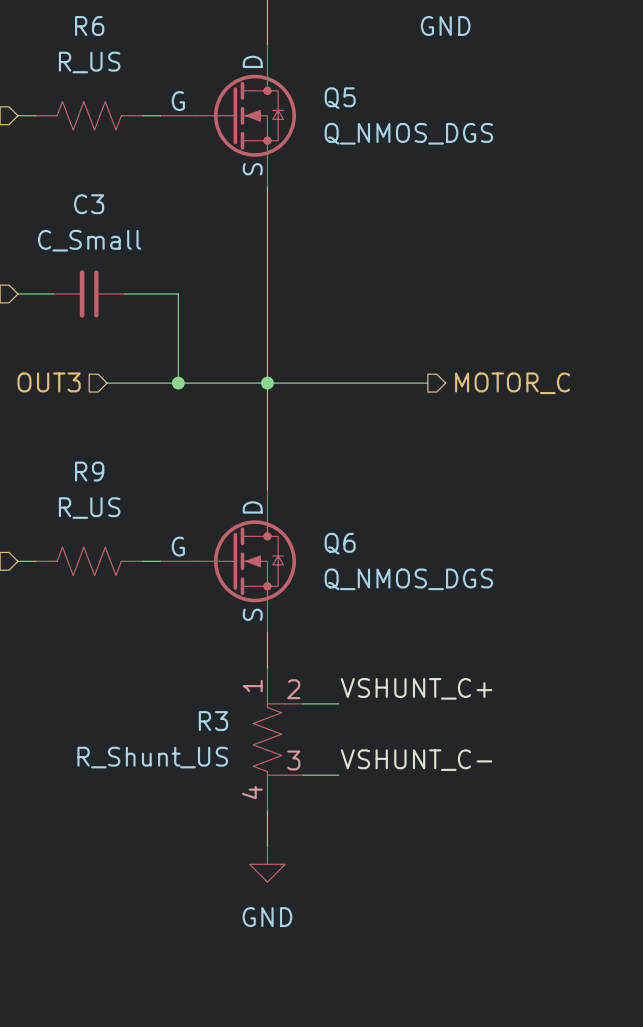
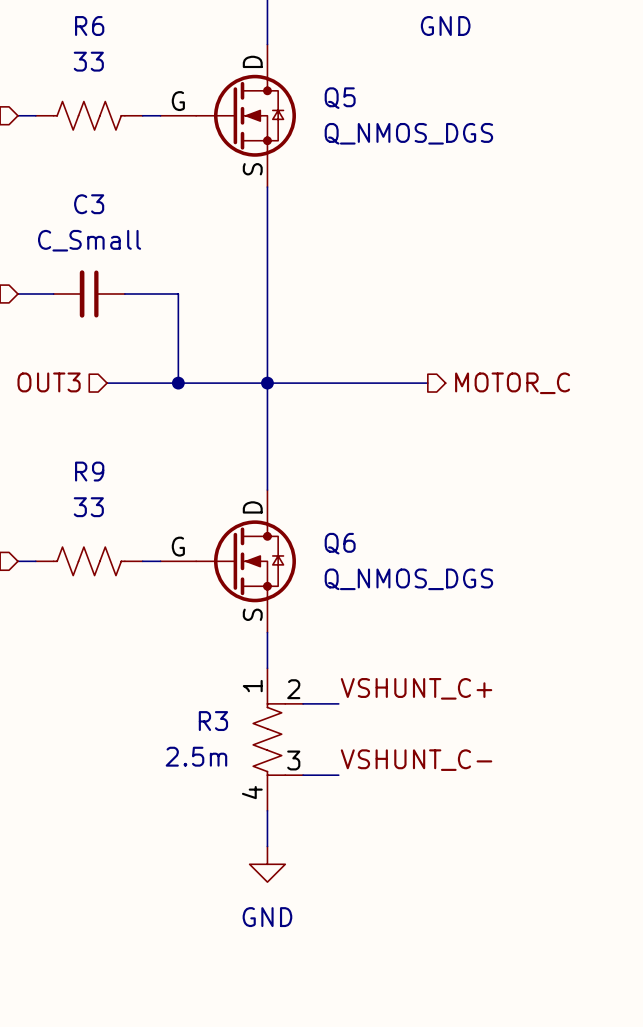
R6 value: R_US (89, 62) -> 33 (88, 61)
R9 value: R_US (89, 508) -> 33 (88, 507)
R3 value: R_Shunt_US (152, 757) -> 2.5m (196, 756)

